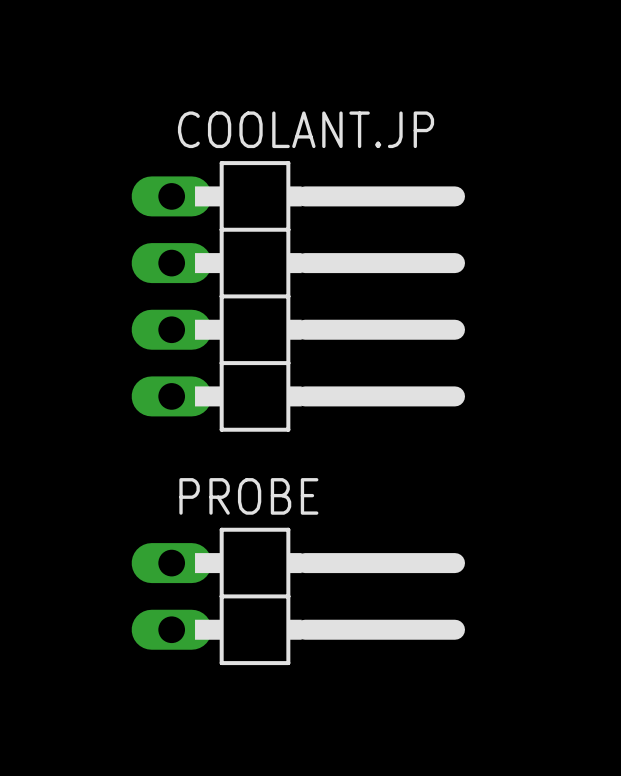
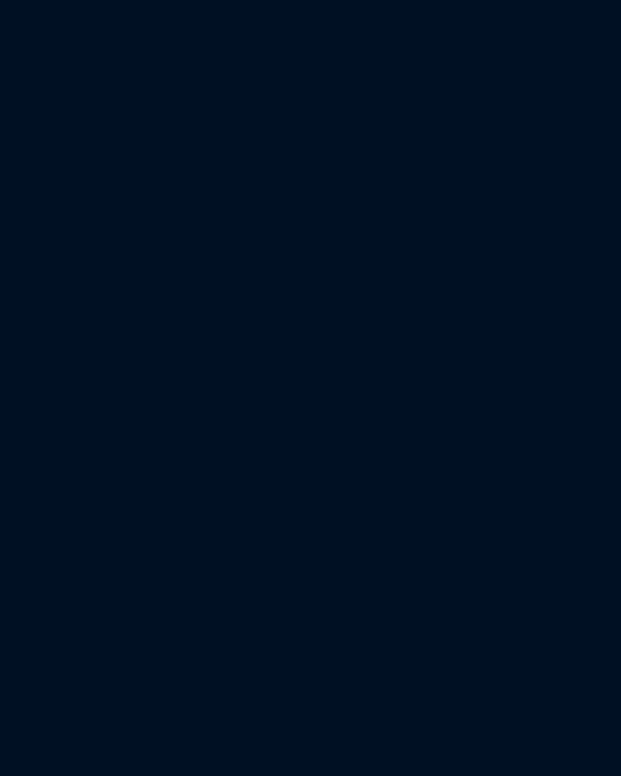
COOLANT.JP: (298, 296) -> none
PROBE: (298, 596) -> none

